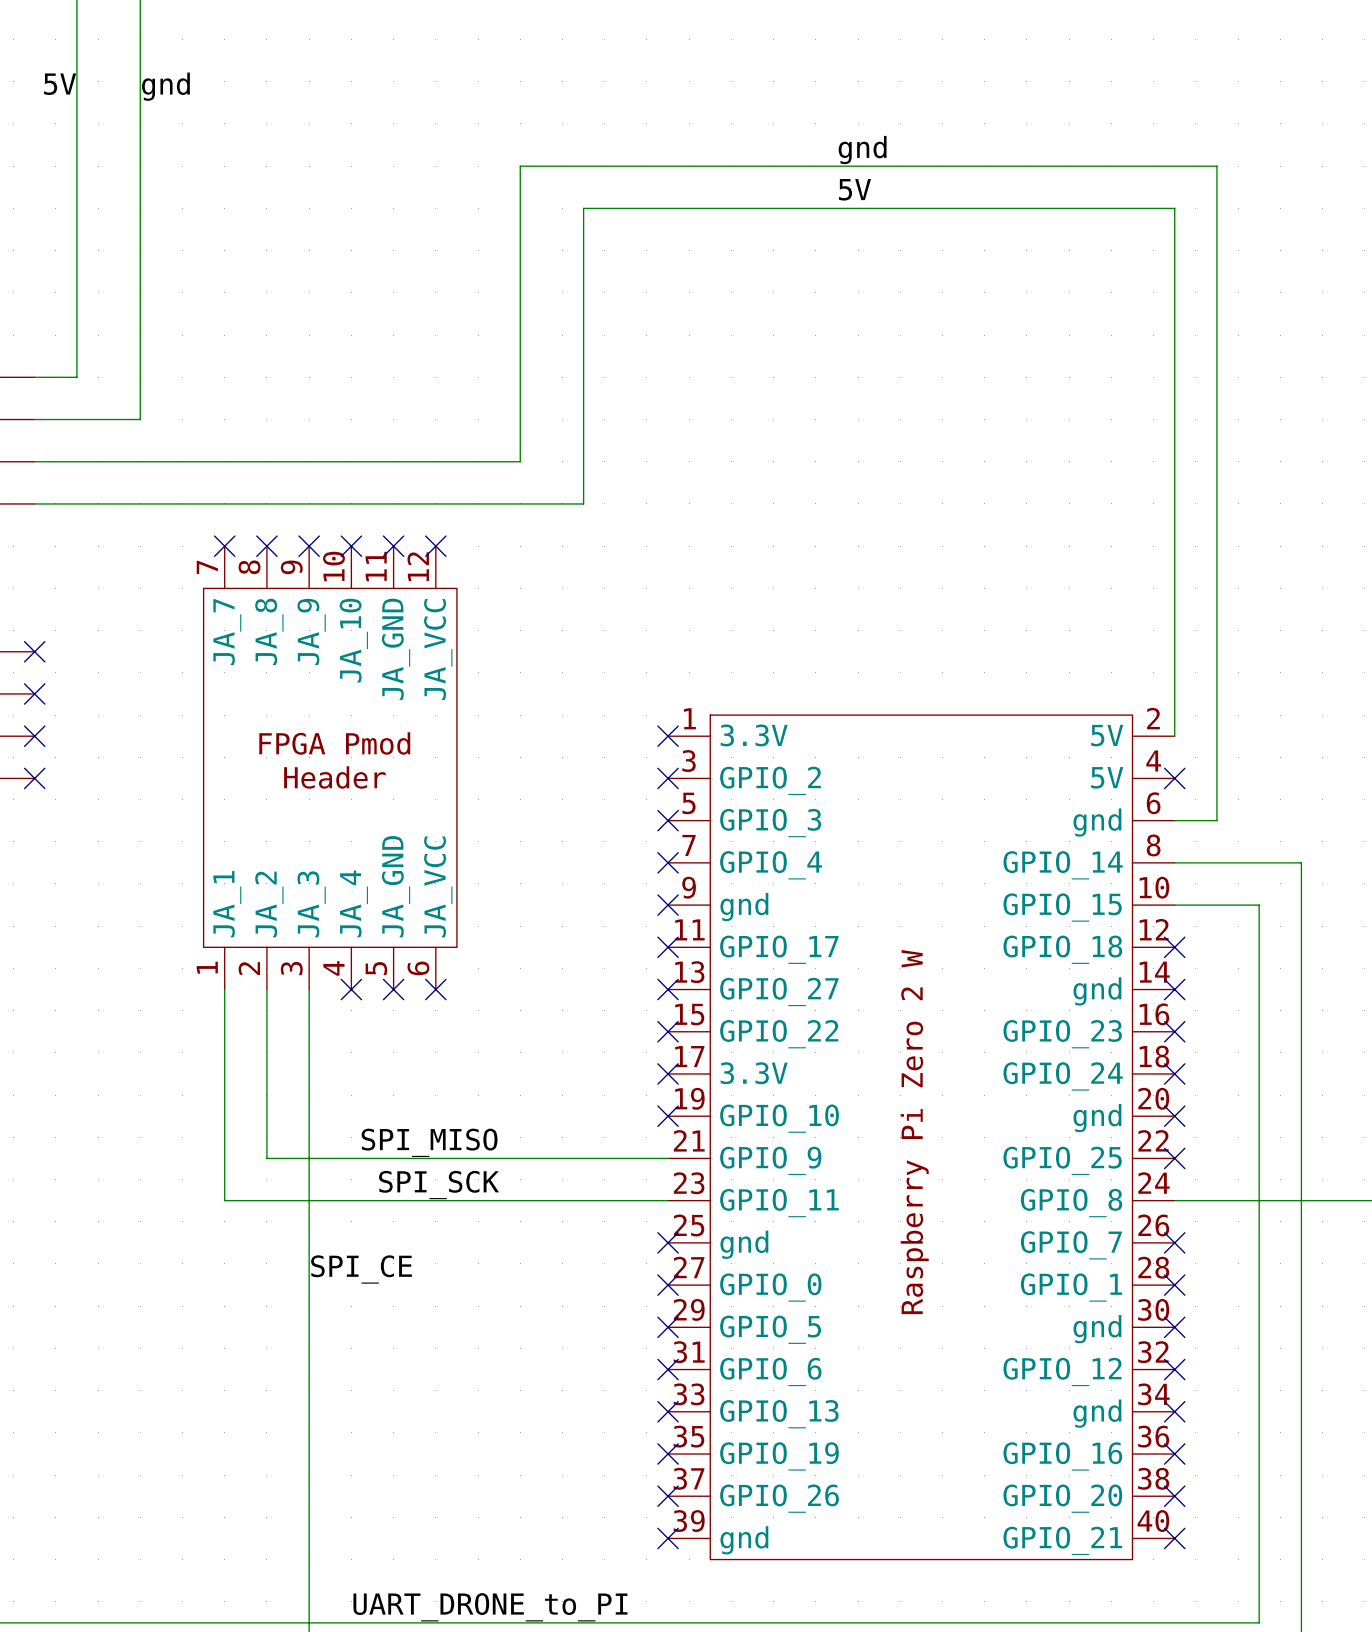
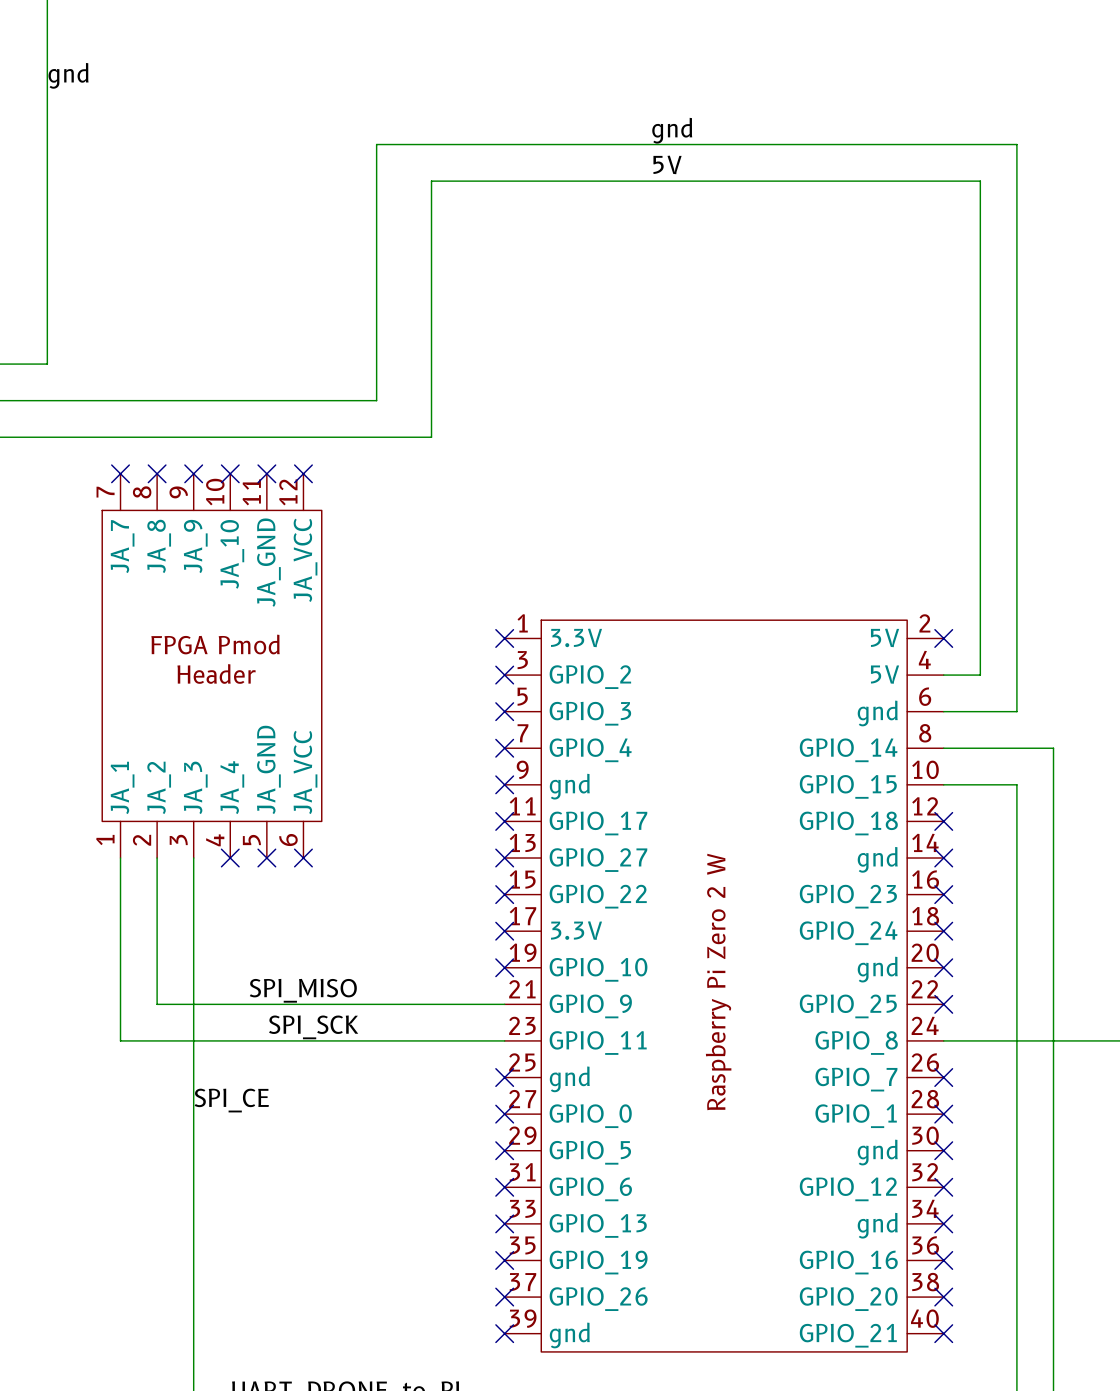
wire: (1216, 166) (1216, 208) -> (943, 181) (980, 181)
wire: none -> (980, 144) (1016, 144) (1016, 711) (980, 711)
wire: (1174, 208) (1174, 736) -> none
no-connect mark position: (1174, 778) -> (943, 638)
wire: (1216, 778) (1216, 820) -> (980, 675) (943, 675)

